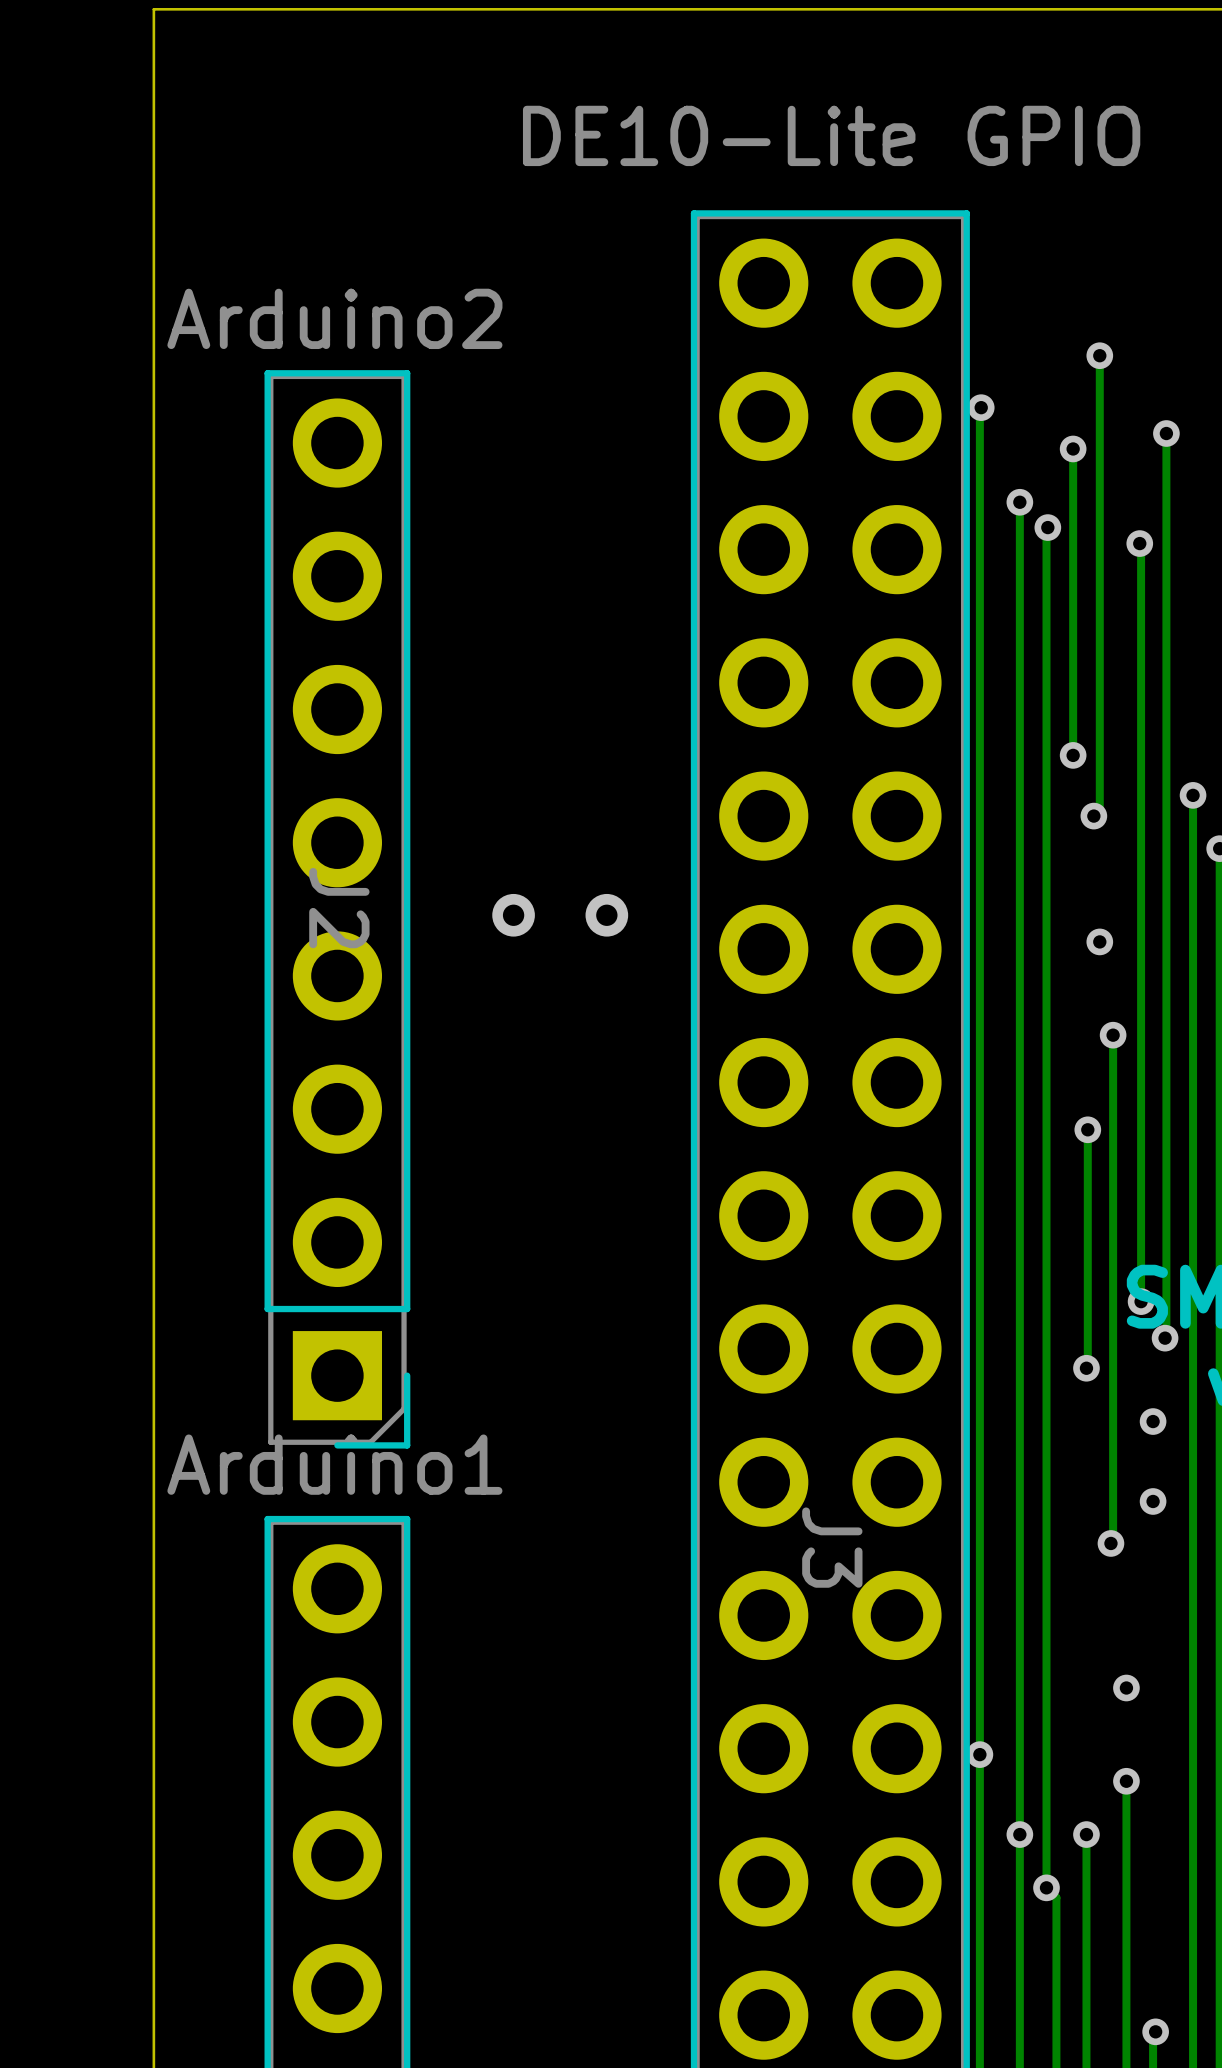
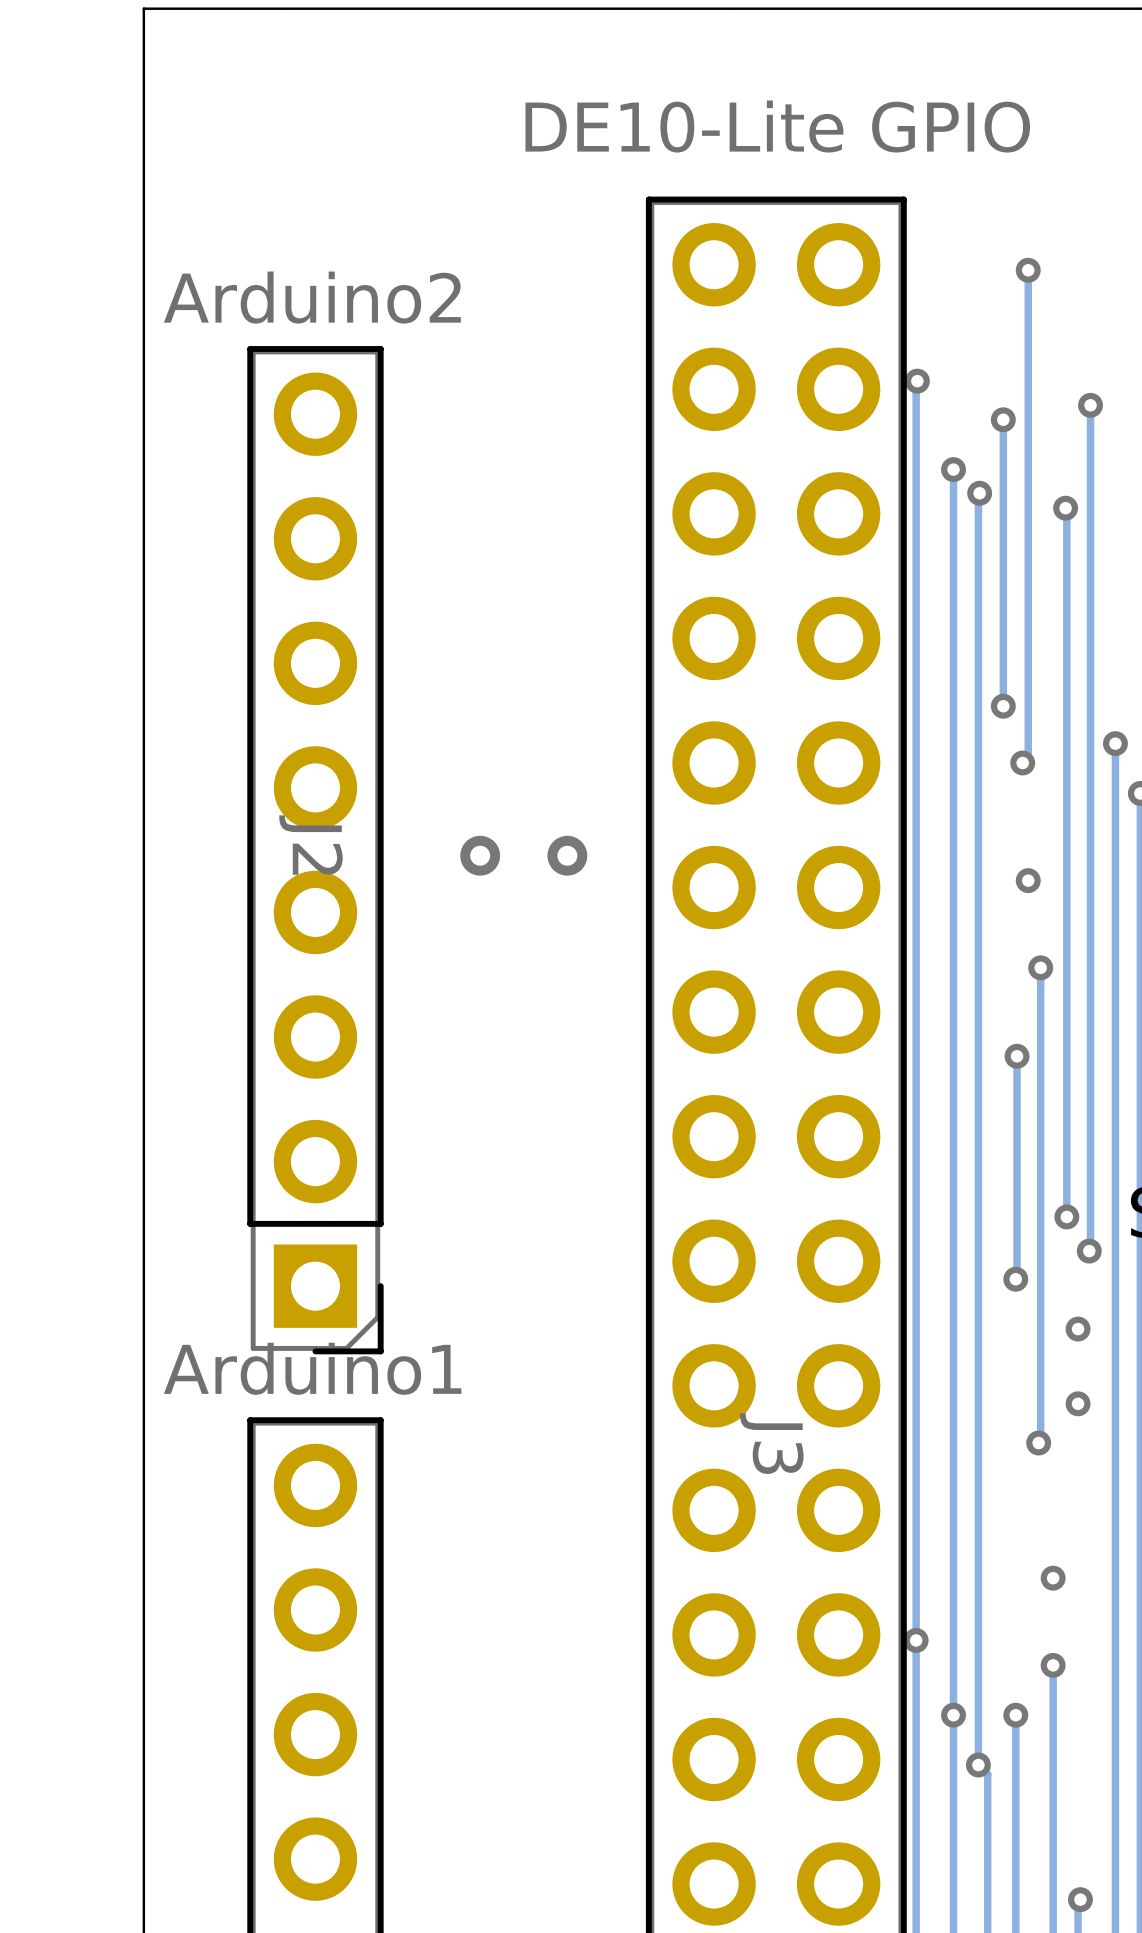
track: none -> (1028, 270) (1028, 332)
via position: (1099, 355) -> (1028, 270)

